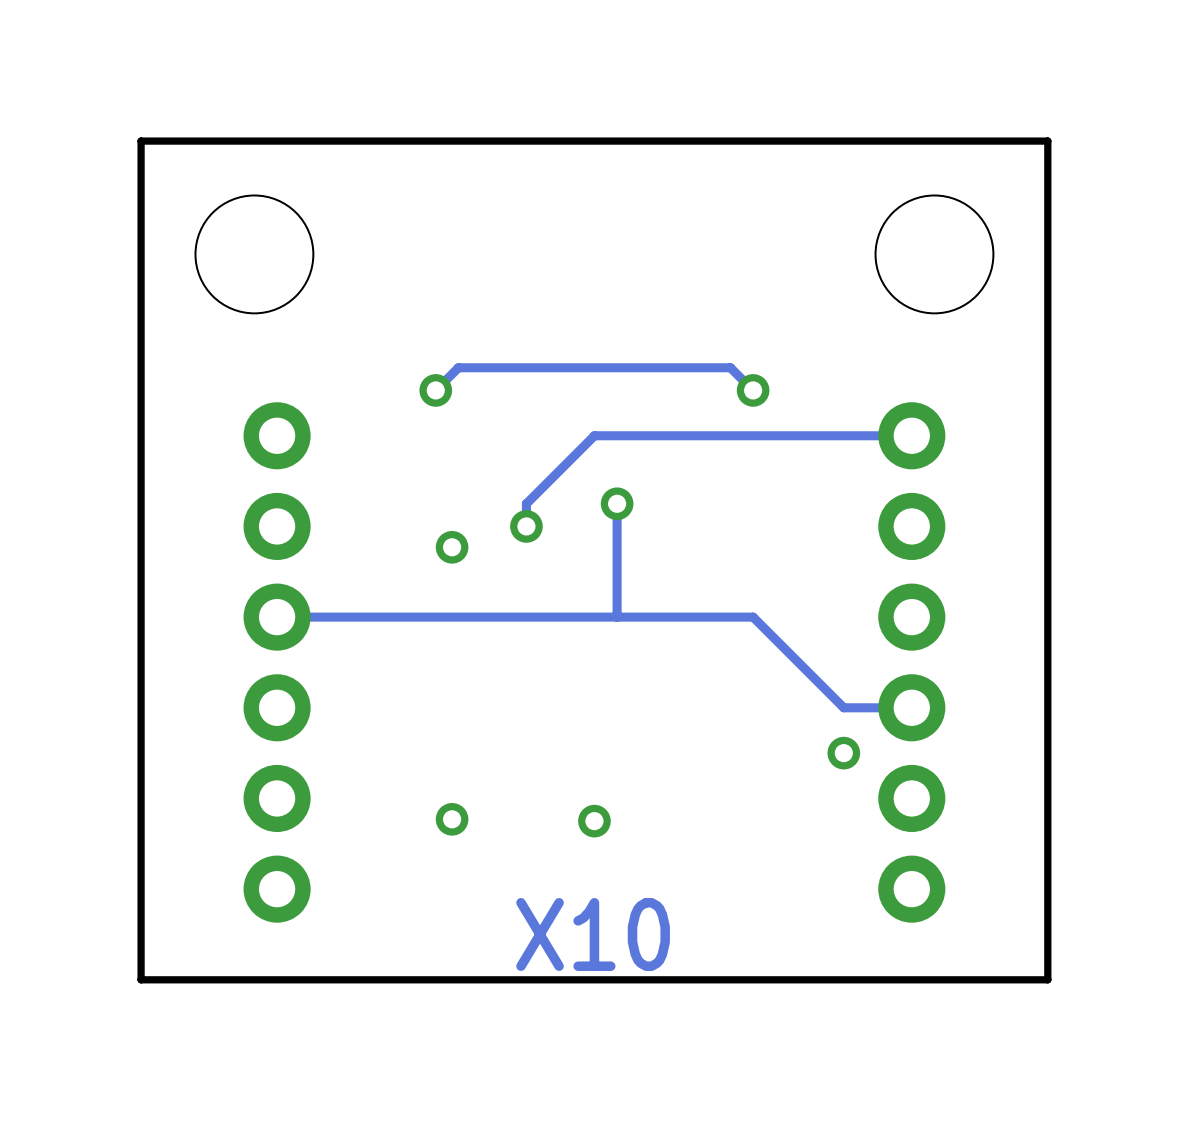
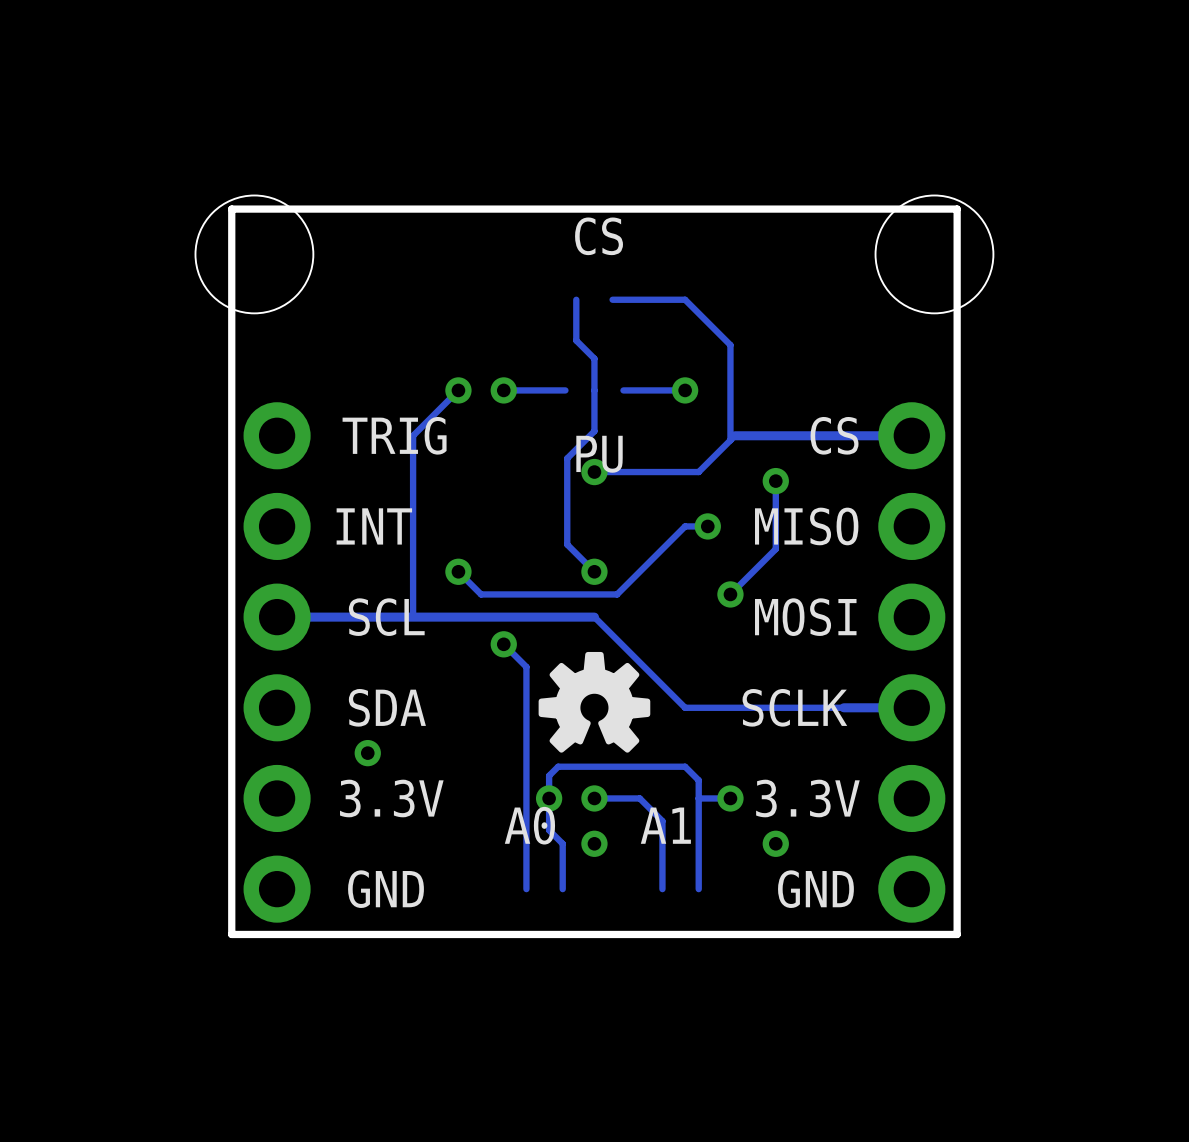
board edge: (1047, 141) (1047, 979) (141, 979) (141, 141) (1047, 141) -> (957, 209) (957, 934) (231, 934) (231, 209) (957, 209)
text: none -> CS (599, 236)
track: none -> (576, 299) (576, 340) (594, 358) (594, 431) (567, 458) (567, 544) (594, 571)
track: none -> (612, 299) (685, 299) (730, 345) (730, 440)
via position: (435, 390) -> (458, 390)
track: none -> (458, 390) (413, 435) (413, 617)
via: none -> (503, 390)
track: none -> (565, 390) (503, 390)
track: none -> (685, 390) (623, 390)
via: none -> (685, 390)
track: (753, 390) (730, 367) (458, 367) (435, 390) -> none
via: (753, 390) -> none
text: none -> TRIG (394, 435)
track: (734, 435) (594, 435) (526, 503) (526, 526) -> (734, 435) (698, 472) (594, 472)
text: none -> CS (834, 435)
text: none -> PU (599, 454)
via: none -> (594, 472)
track: none -> (775, 481) (775, 549) (730, 594)
via: none -> (775, 481)
track: (617, 503) (617, 617) -> none
via: (617, 503) -> none
text: none -> INT (374, 526)
via: (526, 526) -> none
track: none -> (707, 526) (685, 526) (617, 594) (481, 594) (458, 571)
via: none -> (707, 526)
text: none -> MISO (806, 526)
via position: (452, 547) -> (458, 571)
via: none -> (594, 571)
via: none -> (730, 594)
text: none -> SCL (386, 617)
track: (594, 617) (753, 617) (843, 707) -> (594, 617) (685, 707) (843, 707)
text: none -> MOSI (805, 617)
track: none -> (503, 644) (526, 666) (526, 889)
via: none -> (503, 644)
drawing: none -> [538, 651, 651, 753]
text: none -> SDA (387, 707)
text: none -> SCLK (794, 707)
via: none -> (367, 753)
via: (843, 753) -> none
text: none -> 3.3V (391, 798)
via: none -> (549, 798)
track: none -> (594, 798) (639, 798) (662, 821) (662, 889)
via: none -> (594, 798)
track: none -> (730, 798) (698, 798)
via: none -> (730, 798)
text: none -> 3.3V (807, 798)
via: (452, 819) -> none
via: (594, 821) -> none
text: none -> A0 (529, 825)
text: none -> A1 (665, 825)
via: none -> (594, 843)
via: none -> (775, 843)
text: none -> GND (385, 889)
track: none -> (698, 889) (698, 780) (685, 766) (558, 766) (549, 775) (549, 830) (562, 843) (562, 889)
text: none -> GND (815, 889)
text: X10 (593, 934) -> none

